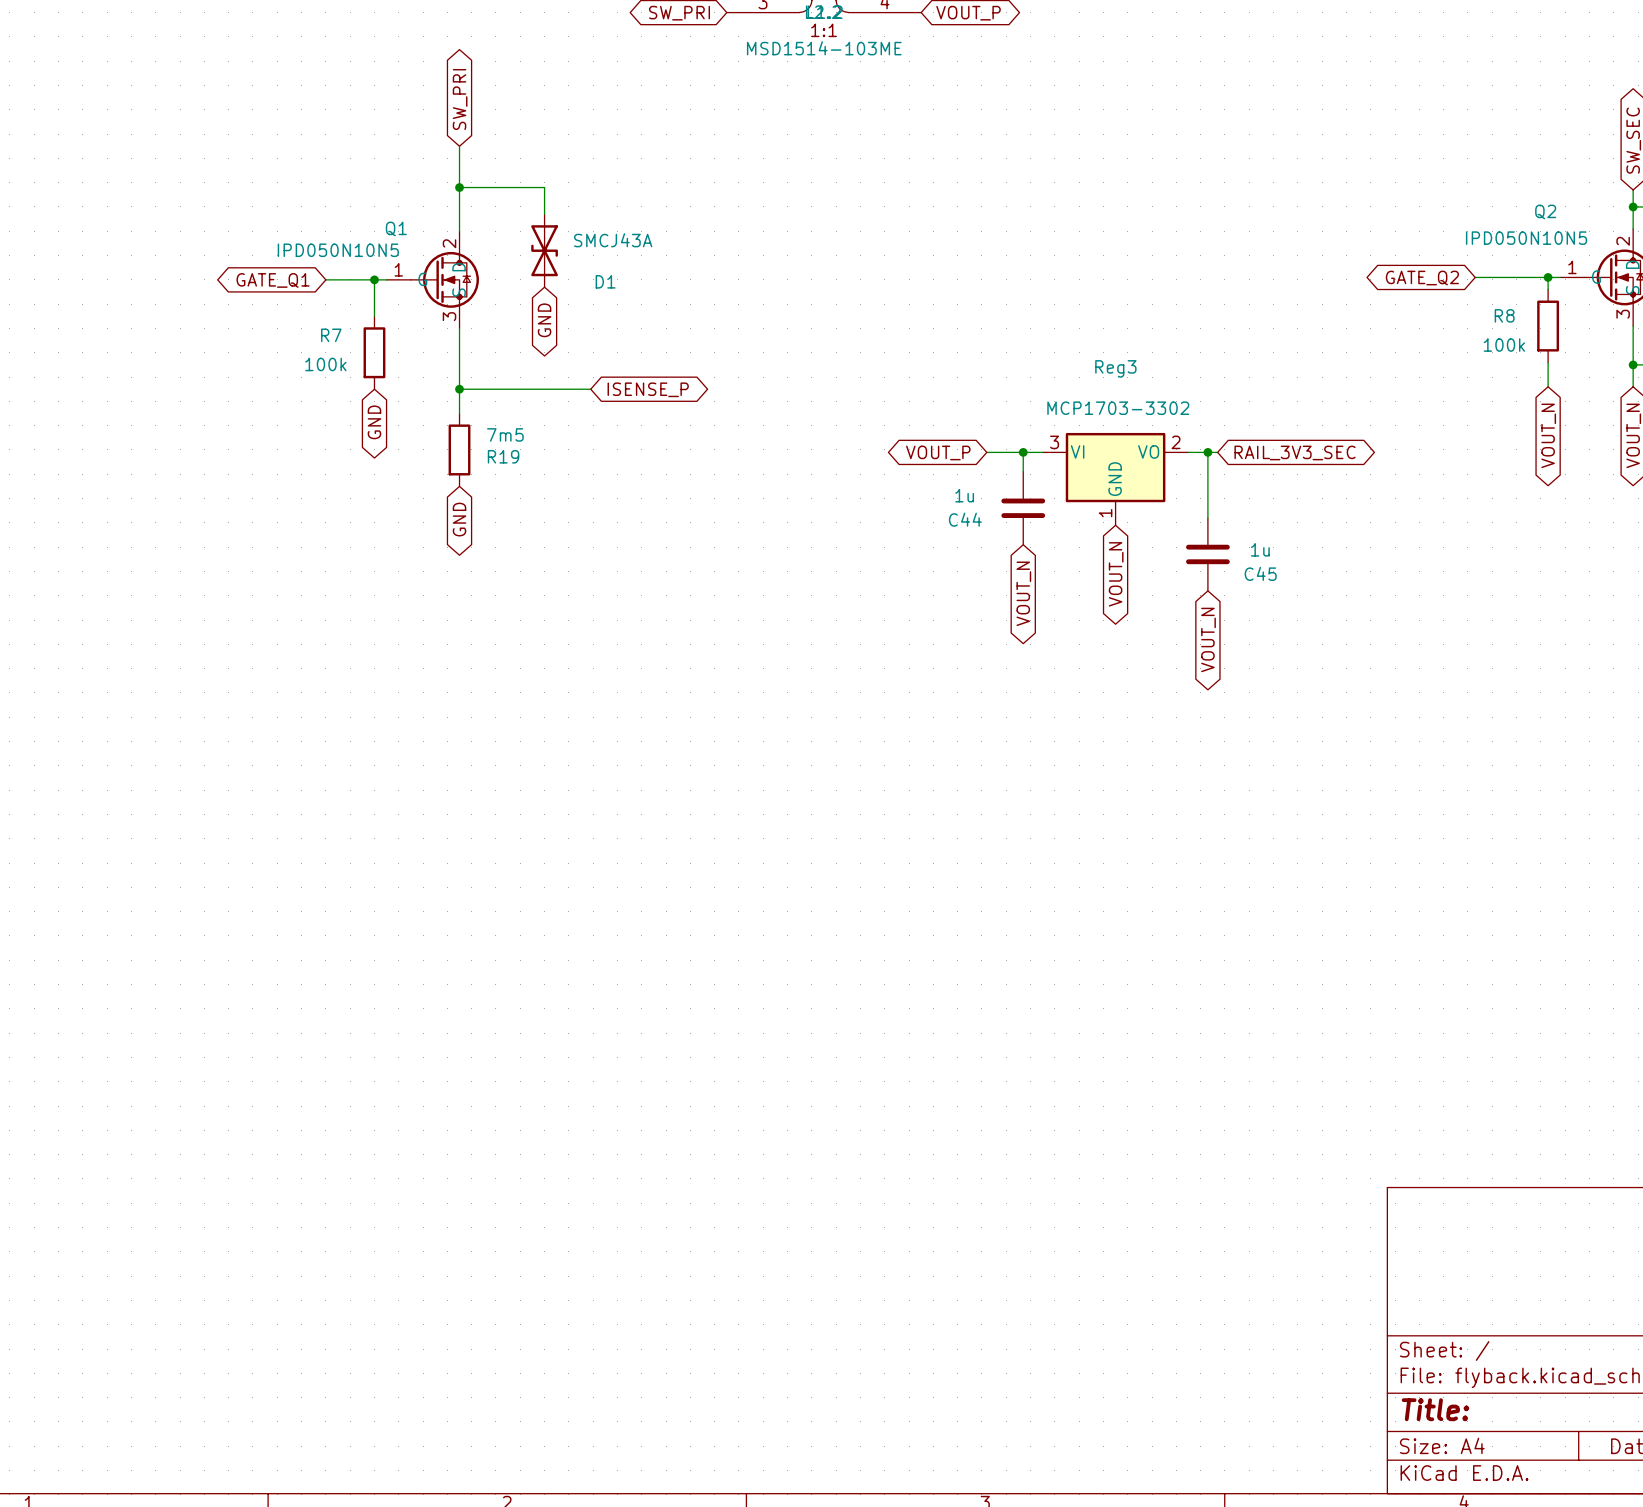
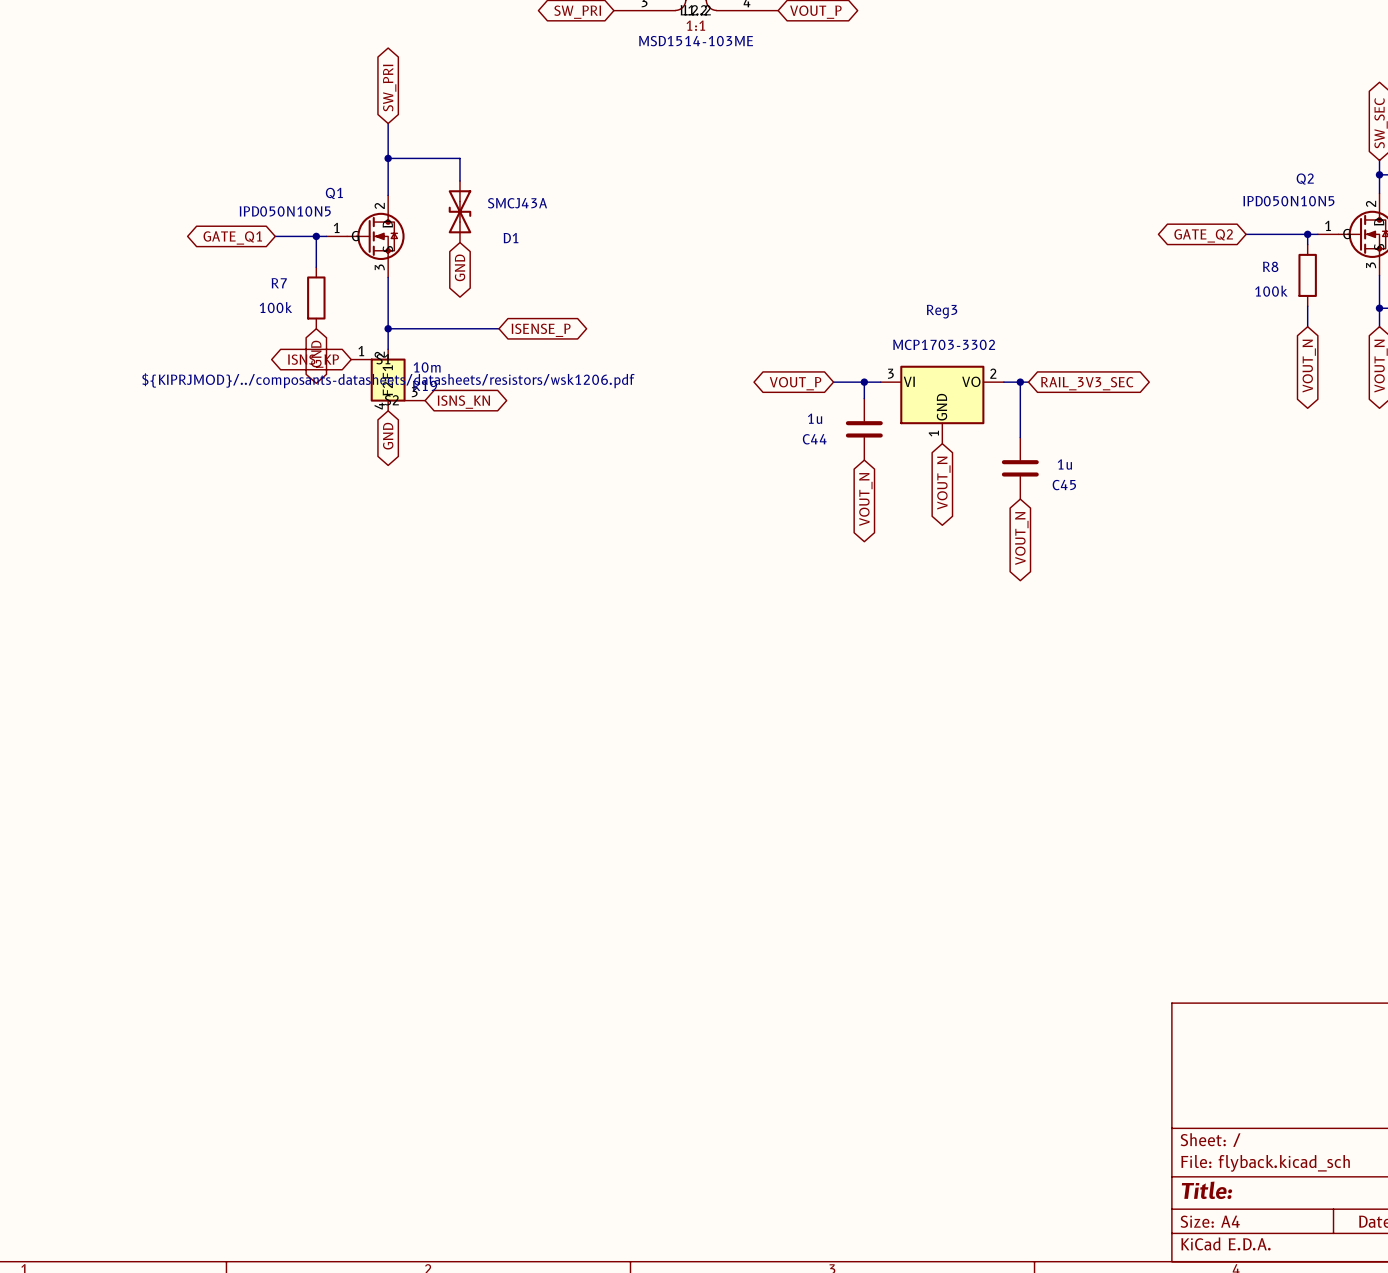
R19 symbol: [448, 413, 471, 487] -> [351, 349, 426, 411]
global label: none -> ISNS_KP (313, 361)
R19 value: 7m5 (505, 434) -> 10m (427, 367)
R19 text: none -> ${KIPRJMOD}/../composants-datasheets/datasheets/resistors/wsk1206.pdf (388, 380)
global label: none -> ISNS_KN (463, 402)

